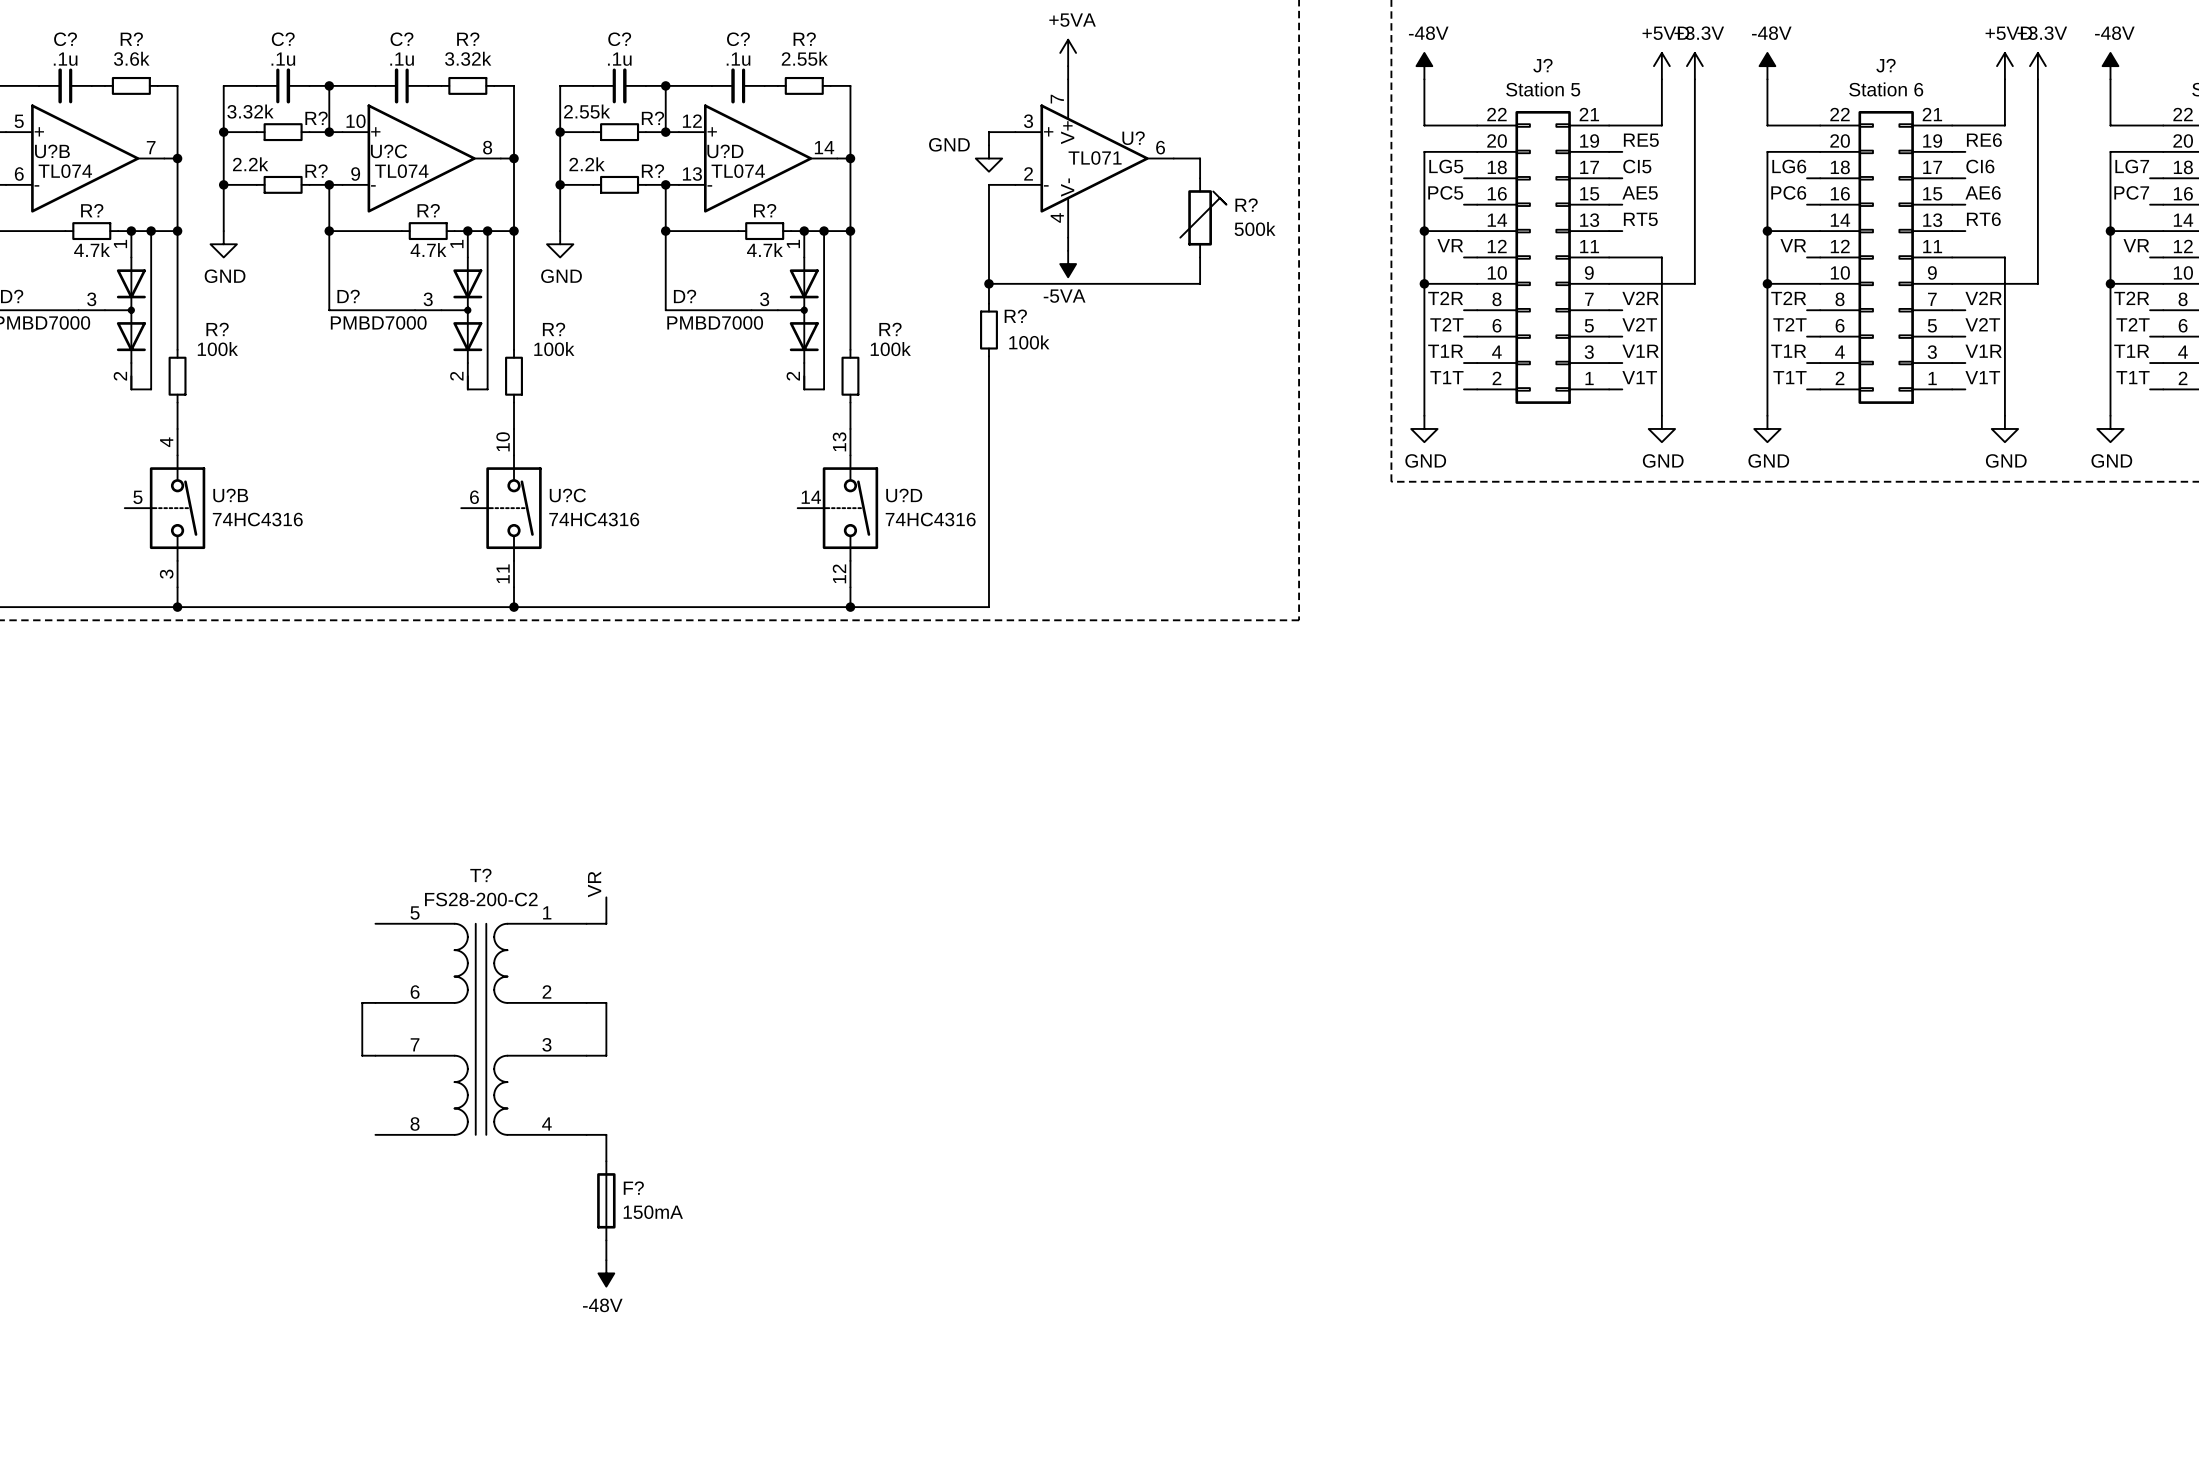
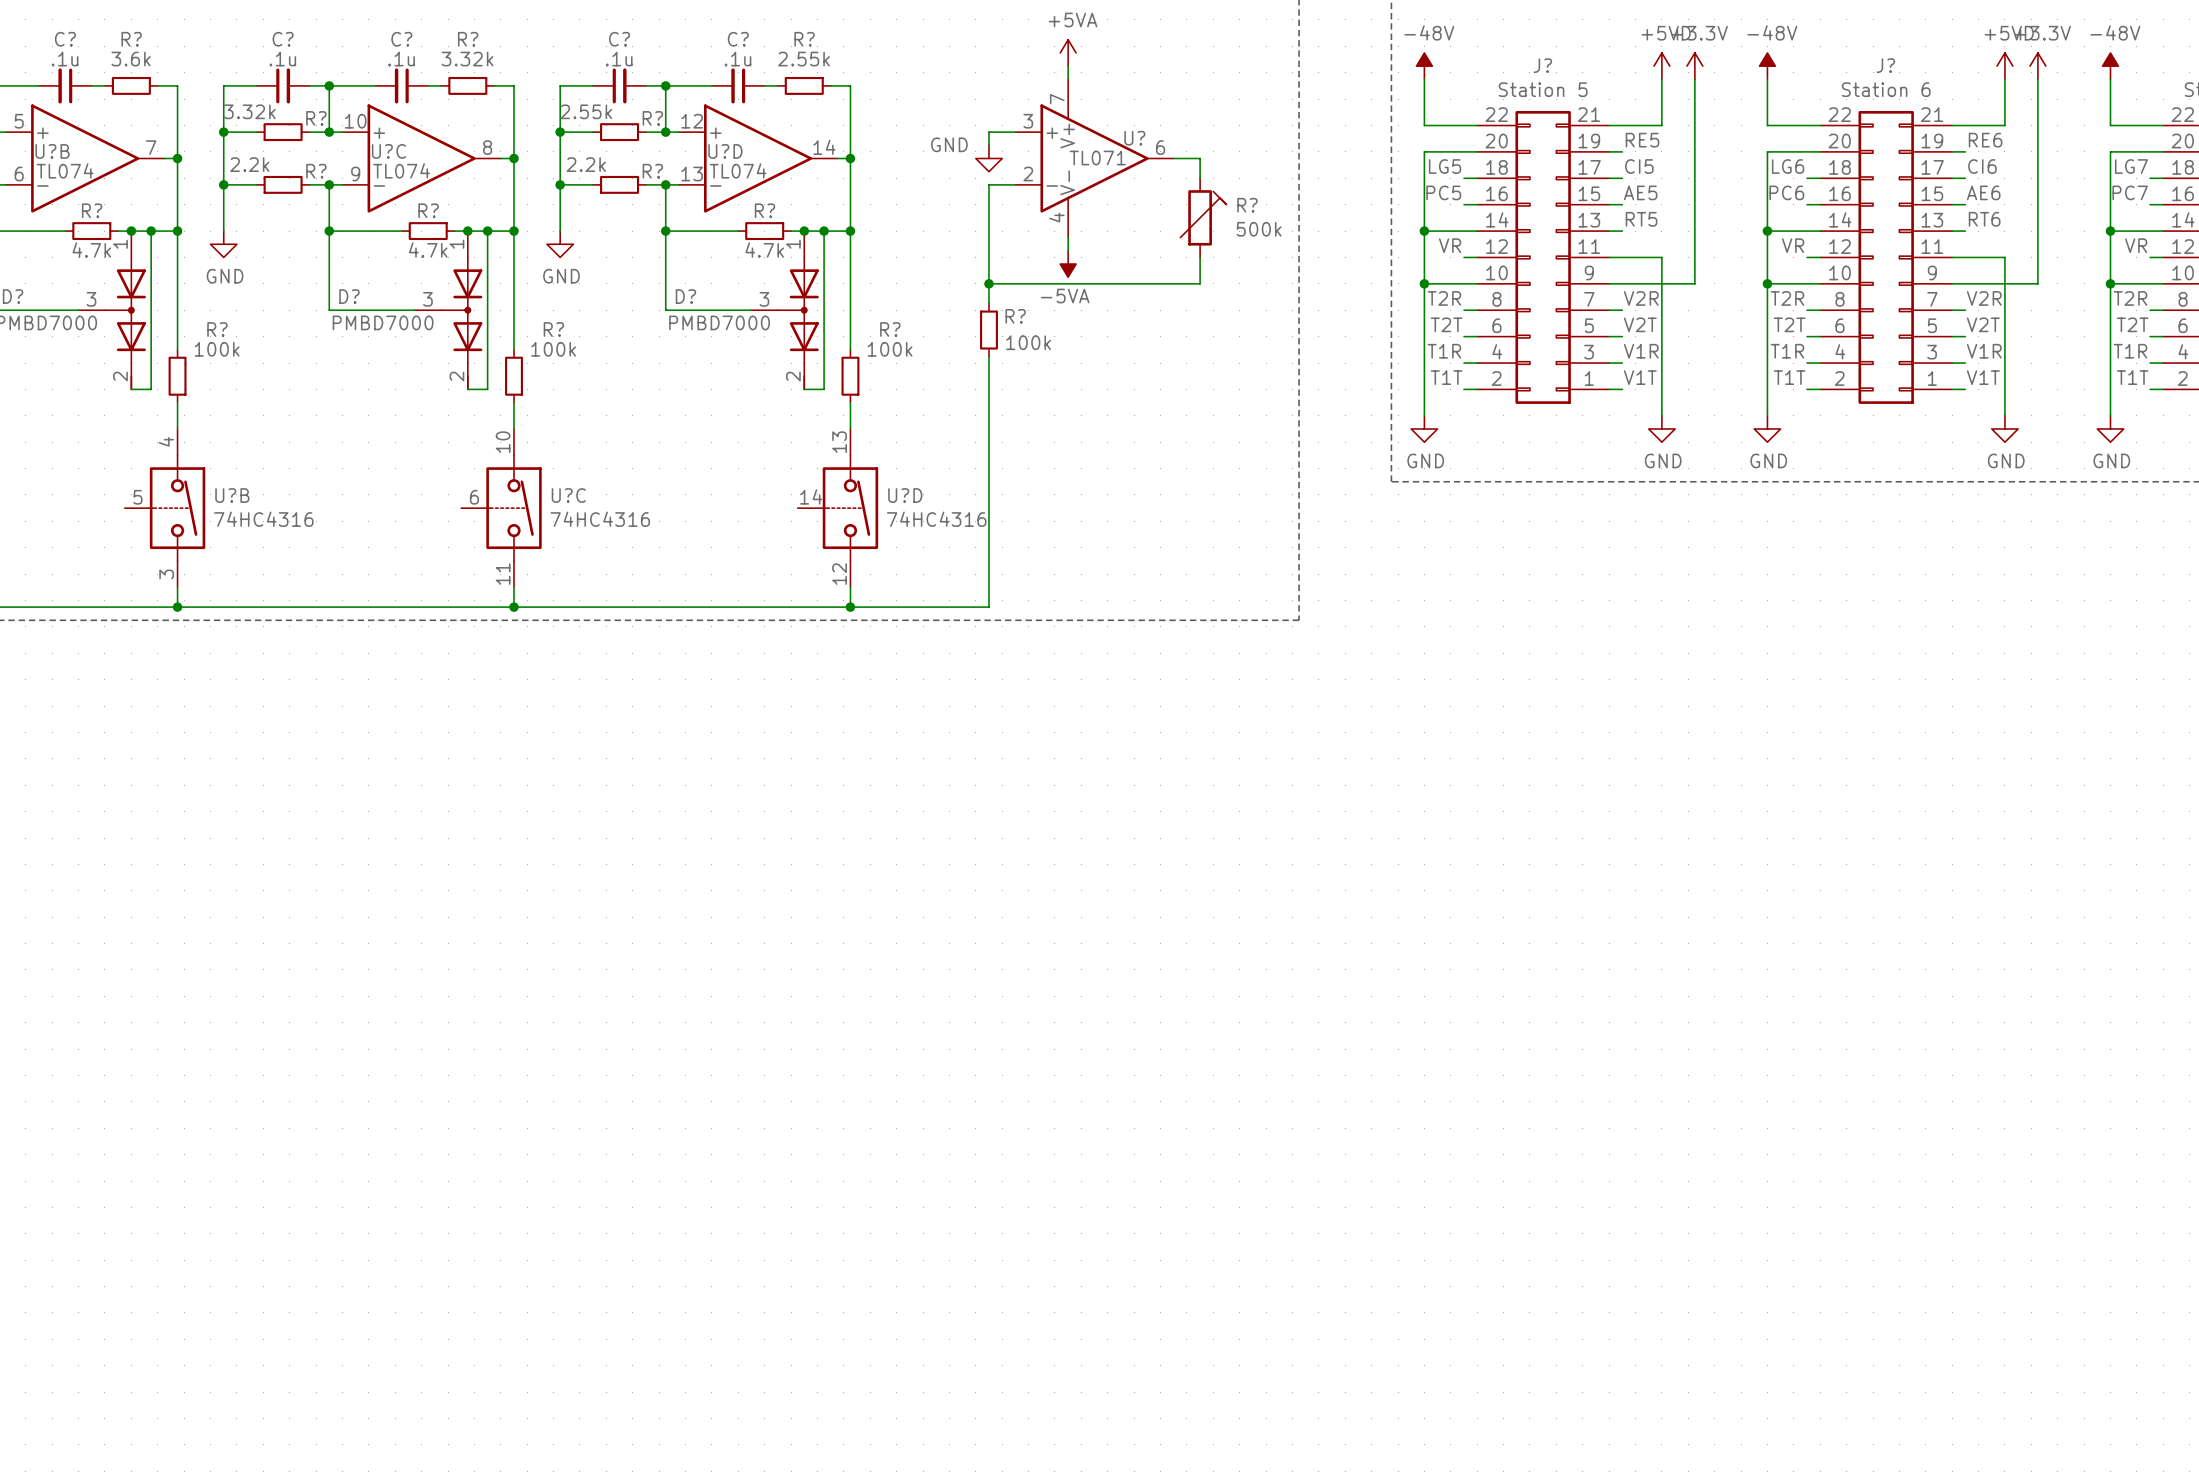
label: VR (594, 884) -> none
wire: (606, 897) (606, 923) (586, 923) -> none
wire: (375, 1002) (362, 1002) (362, 1055) (375, 1055) -> none
wire: (586, 1002) (606, 1002) (606, 1055) (586, 1055) -> none
T?: FS28-200-C2 (481, 1029) -> none
wire: (586, 1134) (606, 1134) (606, 1161) -> none
F?: 150mA (606, 1200) -> none
wire: (606, 1240) (606, 1260) -> none
power symbol: -48V (606, 1273) -> none

